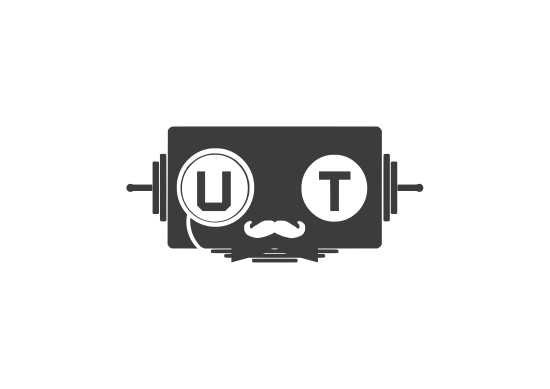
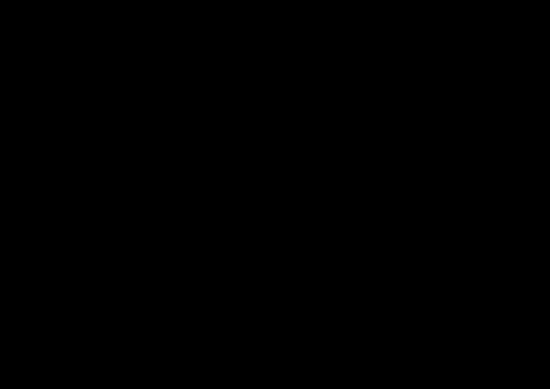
drawing: [126, 126, 424, 263] -> none

